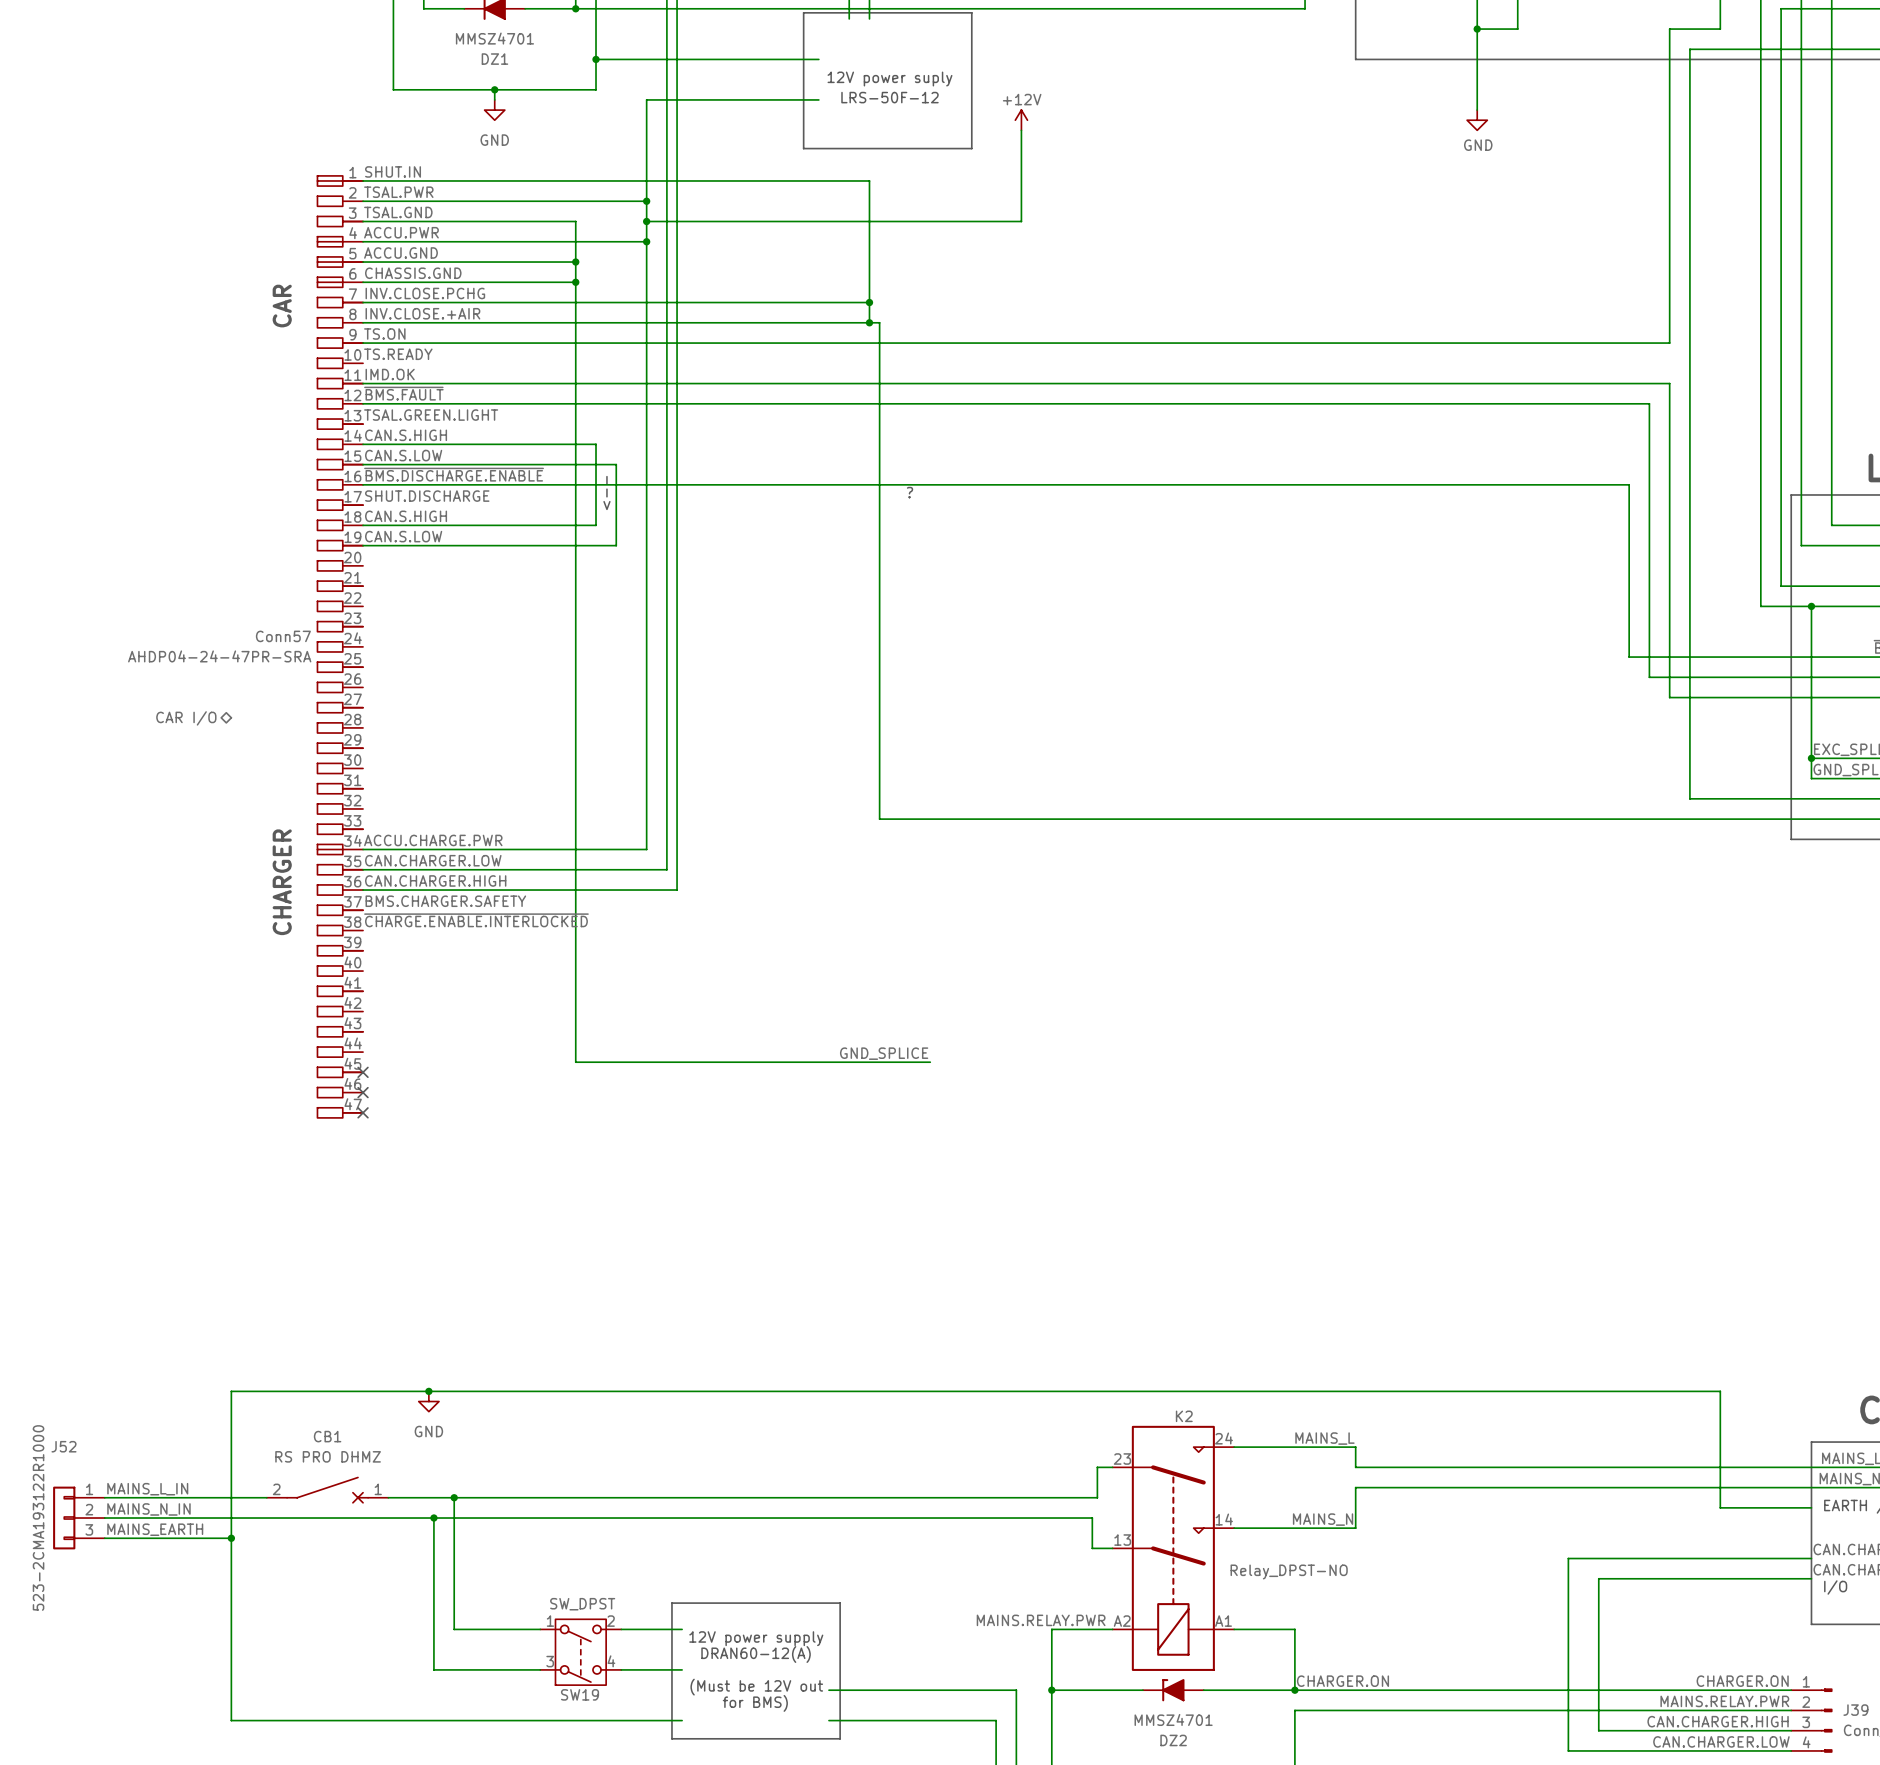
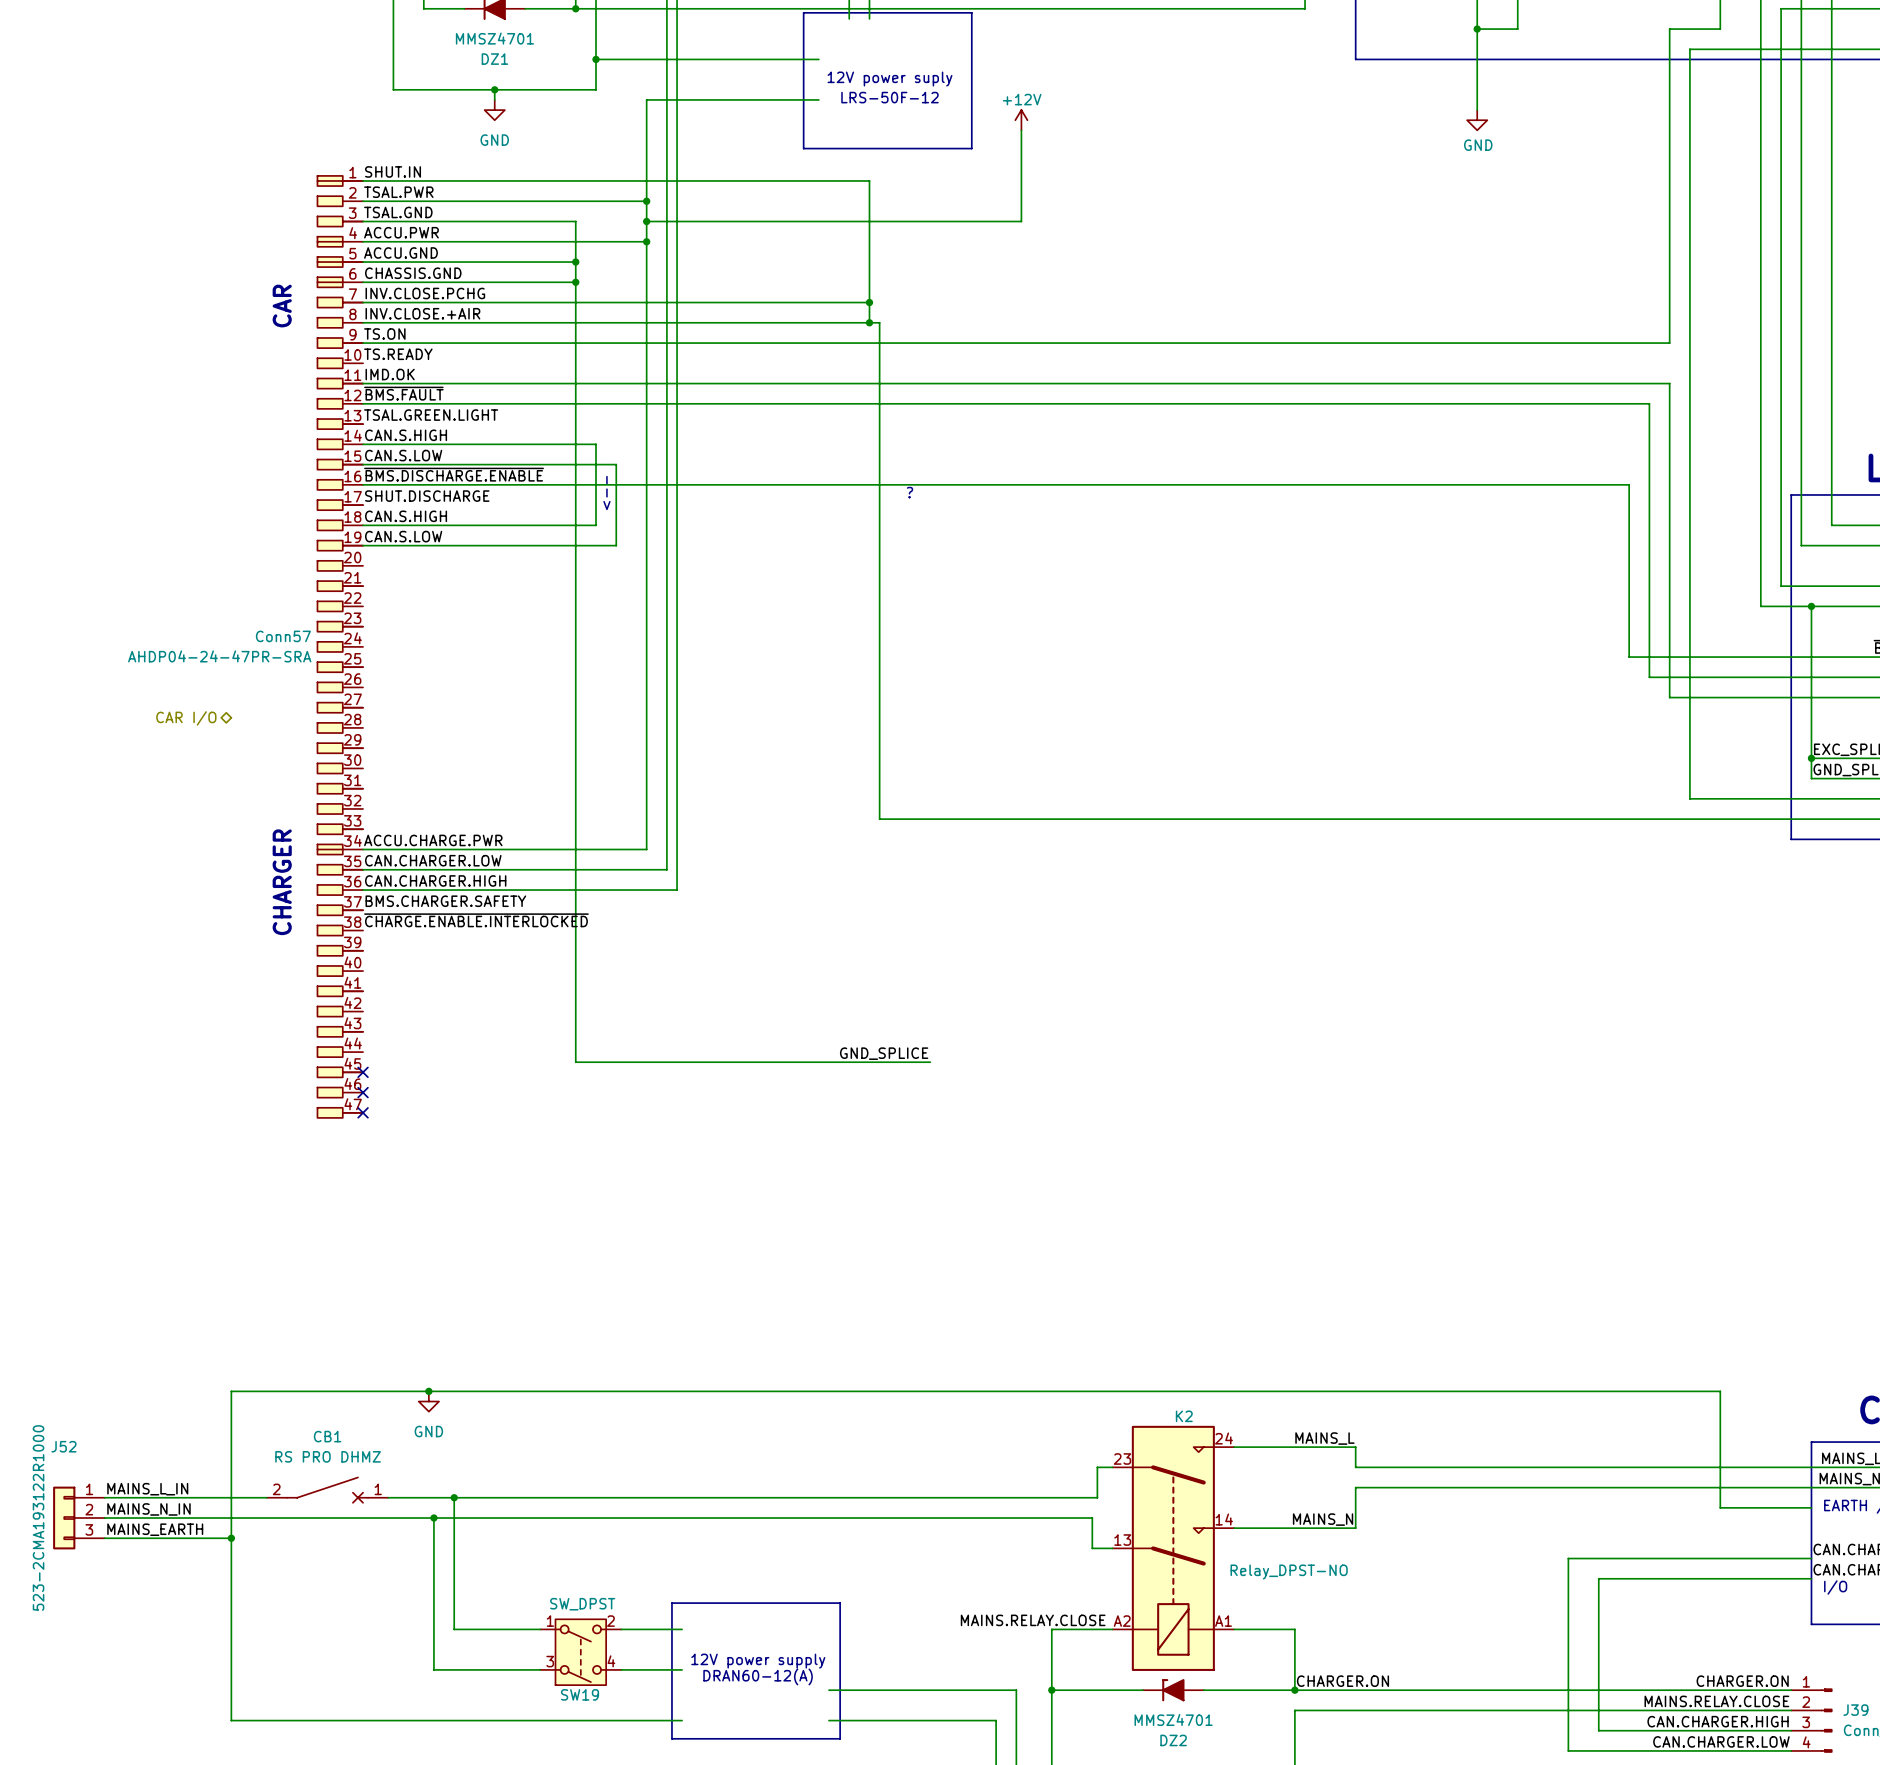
label: MAINS.RELAY.PWR (1041, 1620) -> MAINS.RELAY.CLOSE (1033, 1620)
text: 12V power supply (756, 1638) -> none
text: DRAN60-12(A) (756, 1654) -> 12V power supply (758, 1661)
text: none -> DRAN60-12(A) (758, 1676)
text: (Must be 12V out (756, 1687) -> none
label: MAINS.RELAY.PWR (1724, 1701) -> MAINS.RELAY.CLOSE (1716, 1701)
text: for BMS) (755, 1703) -> none

